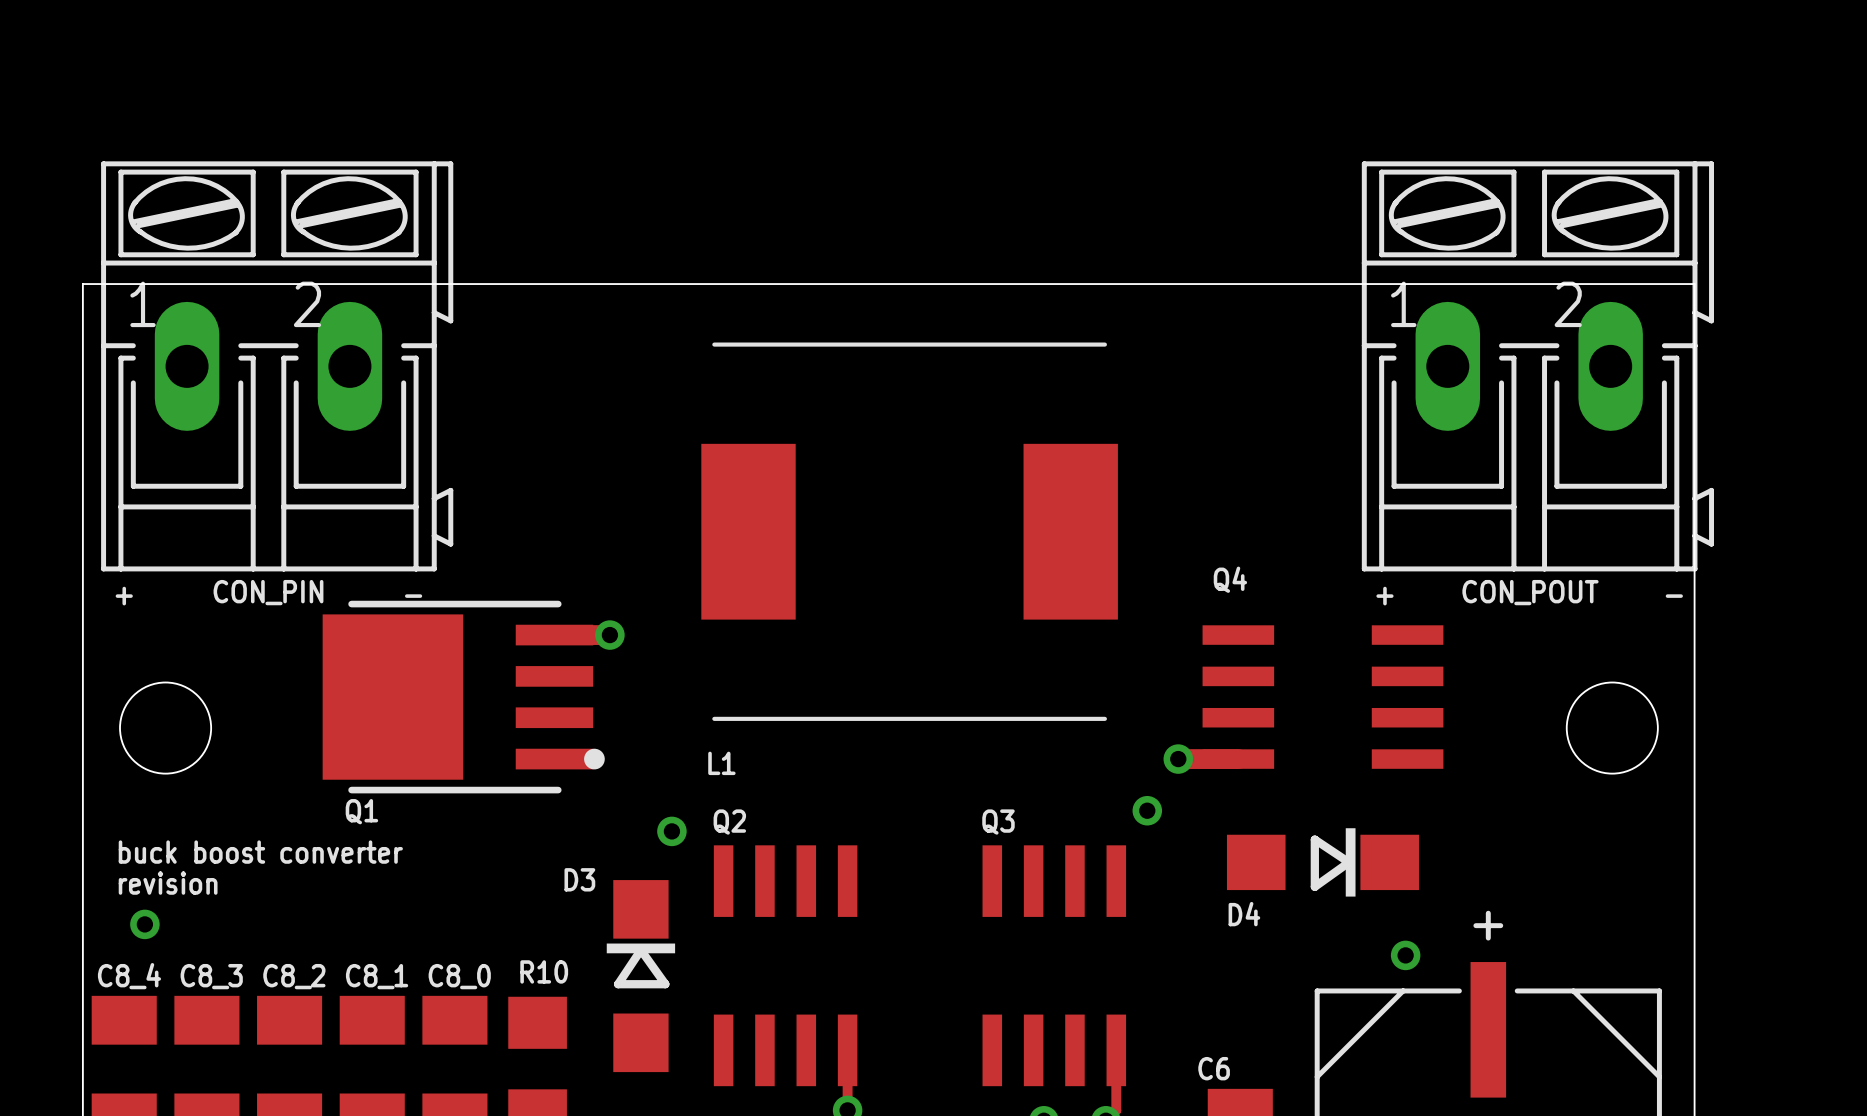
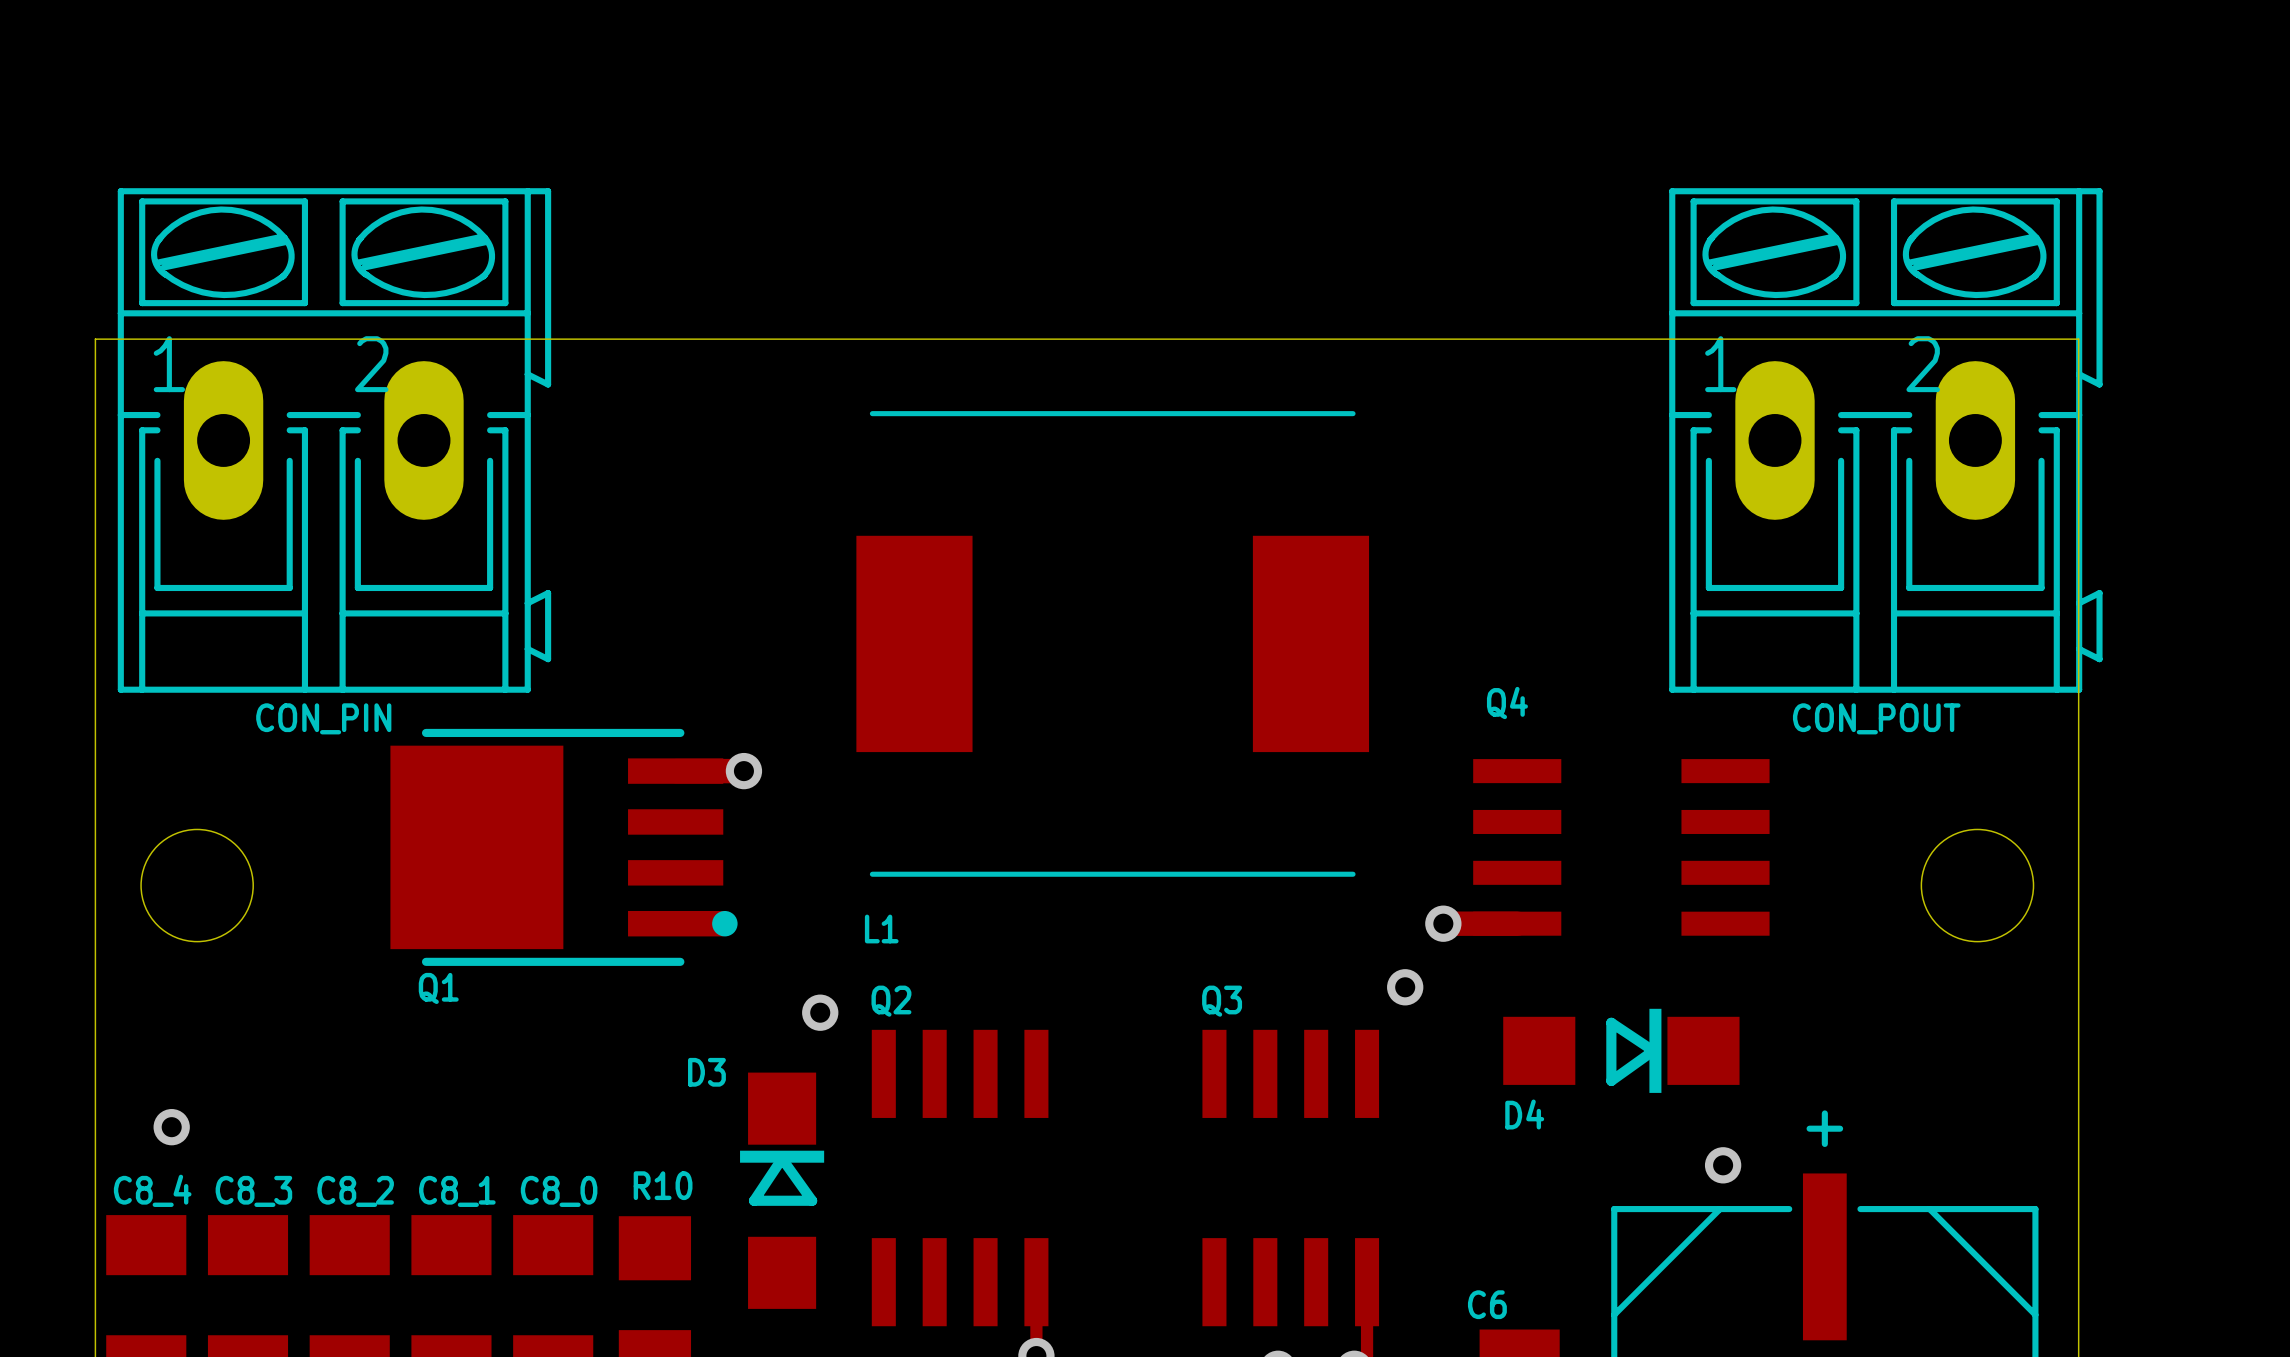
text: + (124, 596) -> none
text: - (413, 596) -> none
text: + (1384, 596) -> none
text: - (1674, 596) -> none
text: buck boost converter (260, 852) -> none
text: revision (168, 883) -> none

